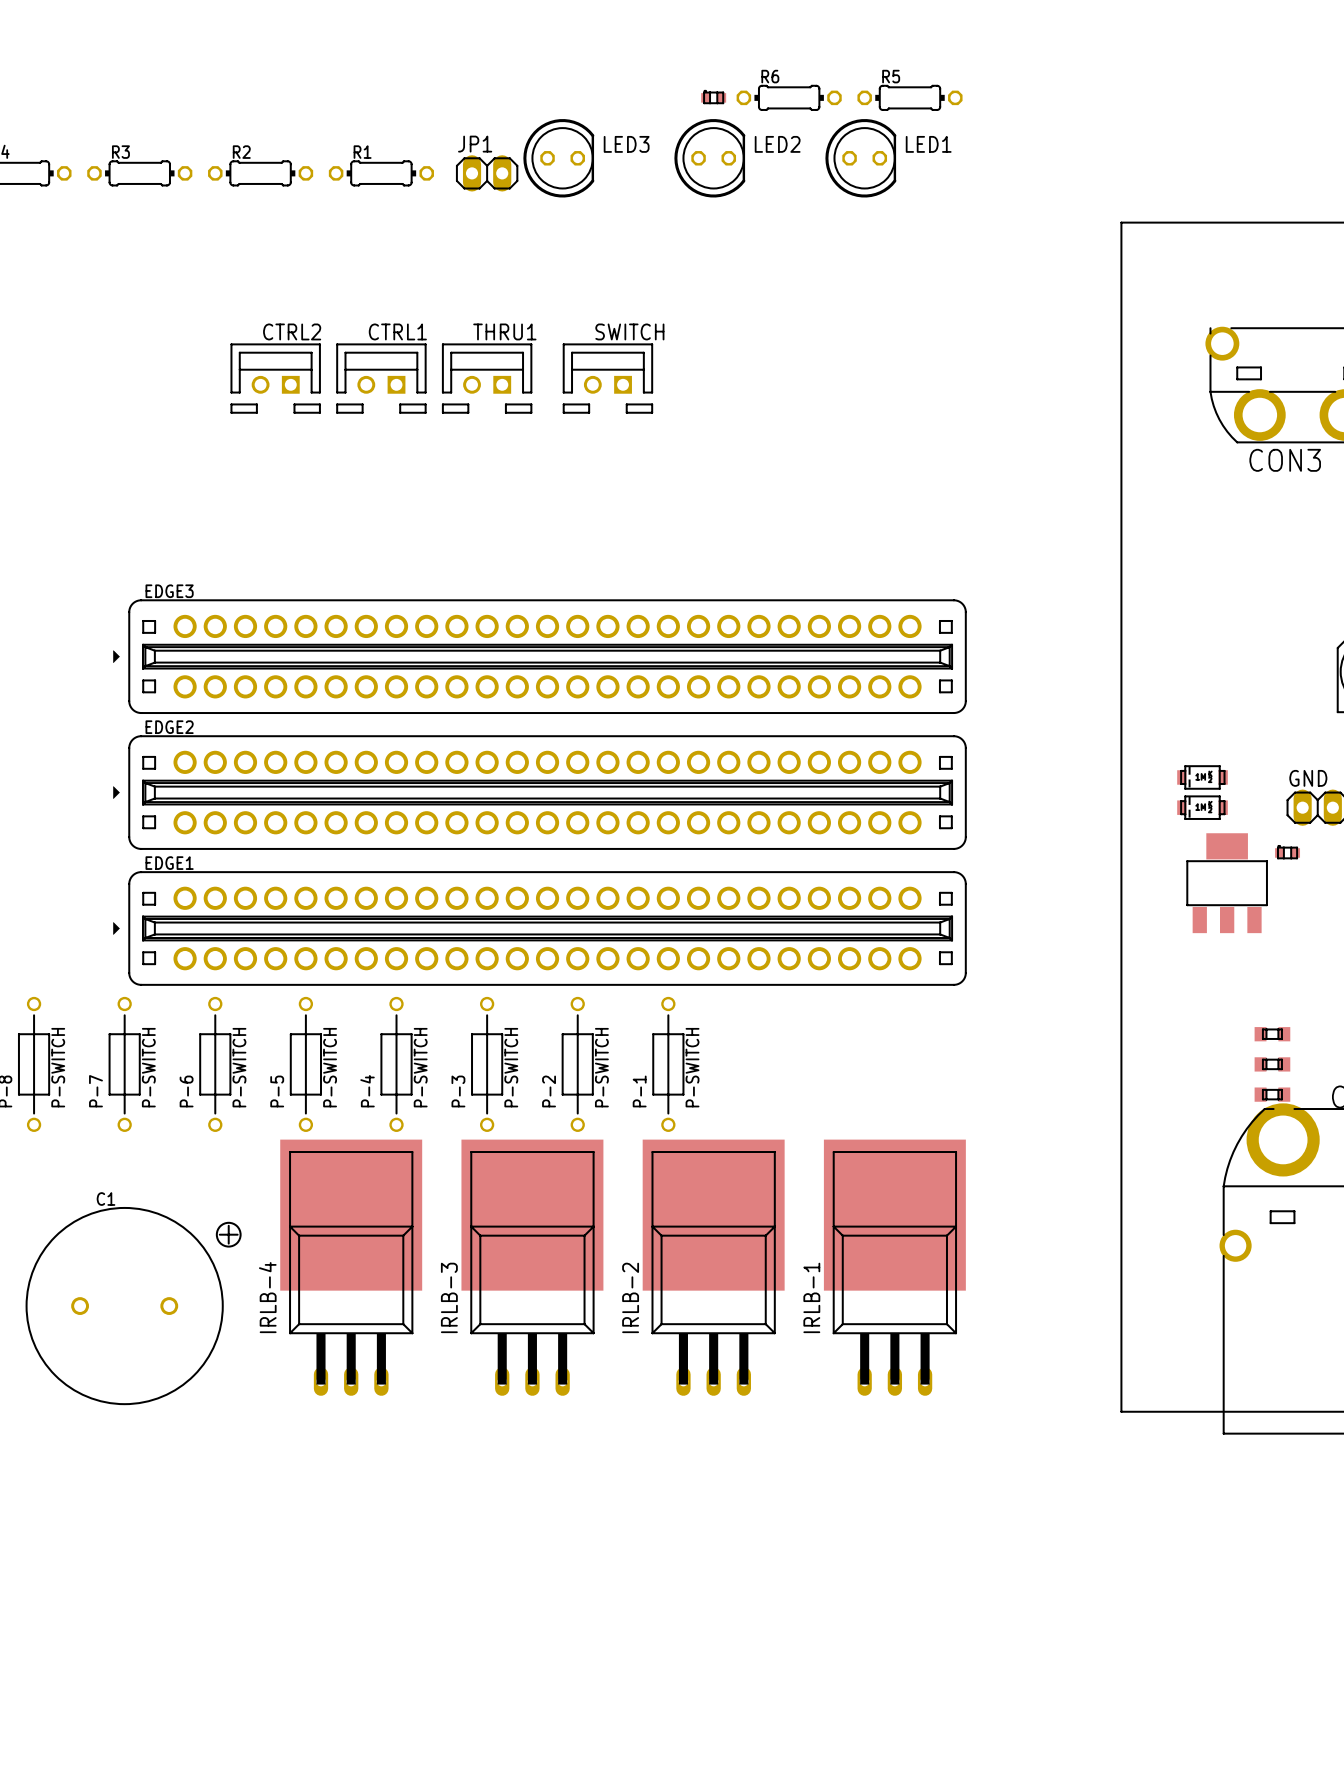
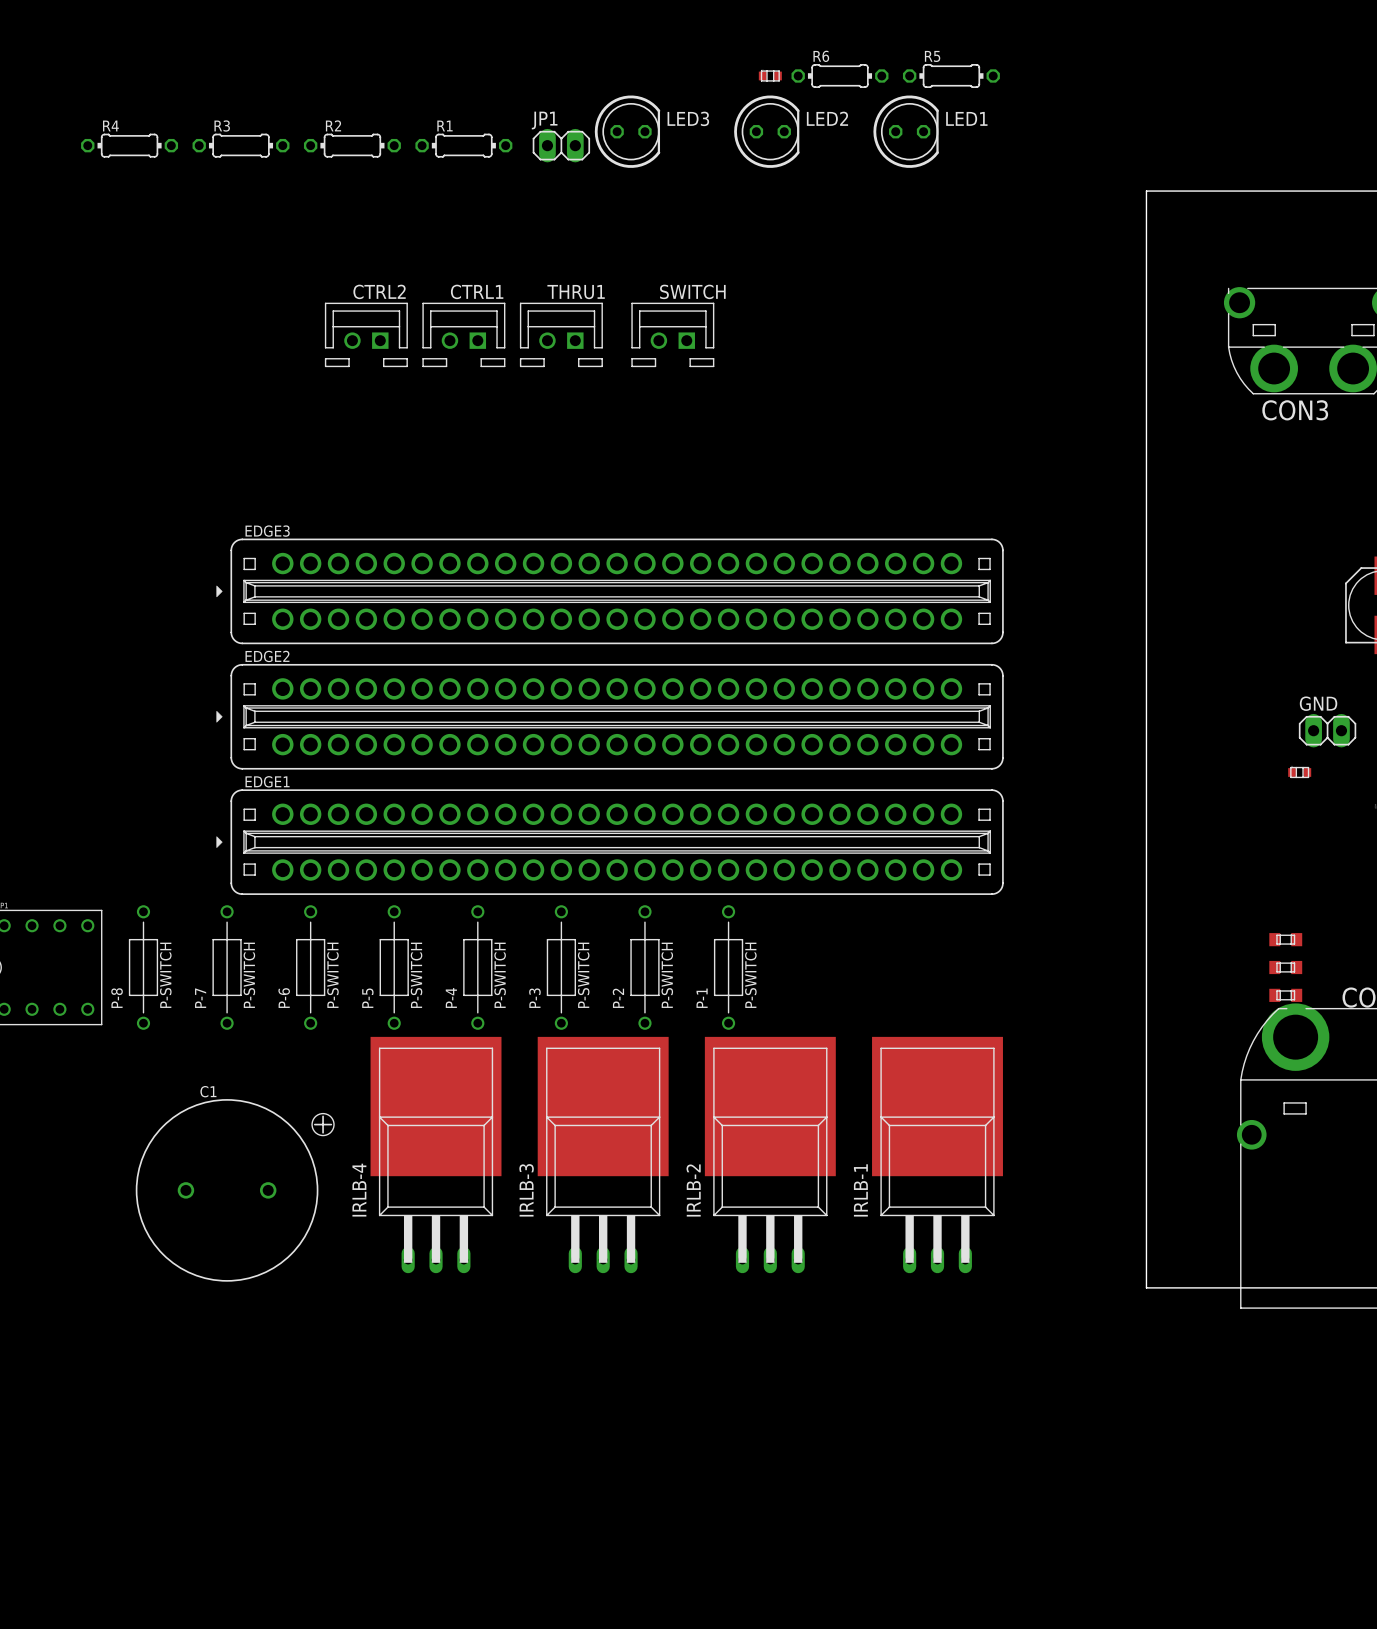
part: (1202, 777) -> none
part: (1202, 807) -> none
part: (1227, 883) -> none

